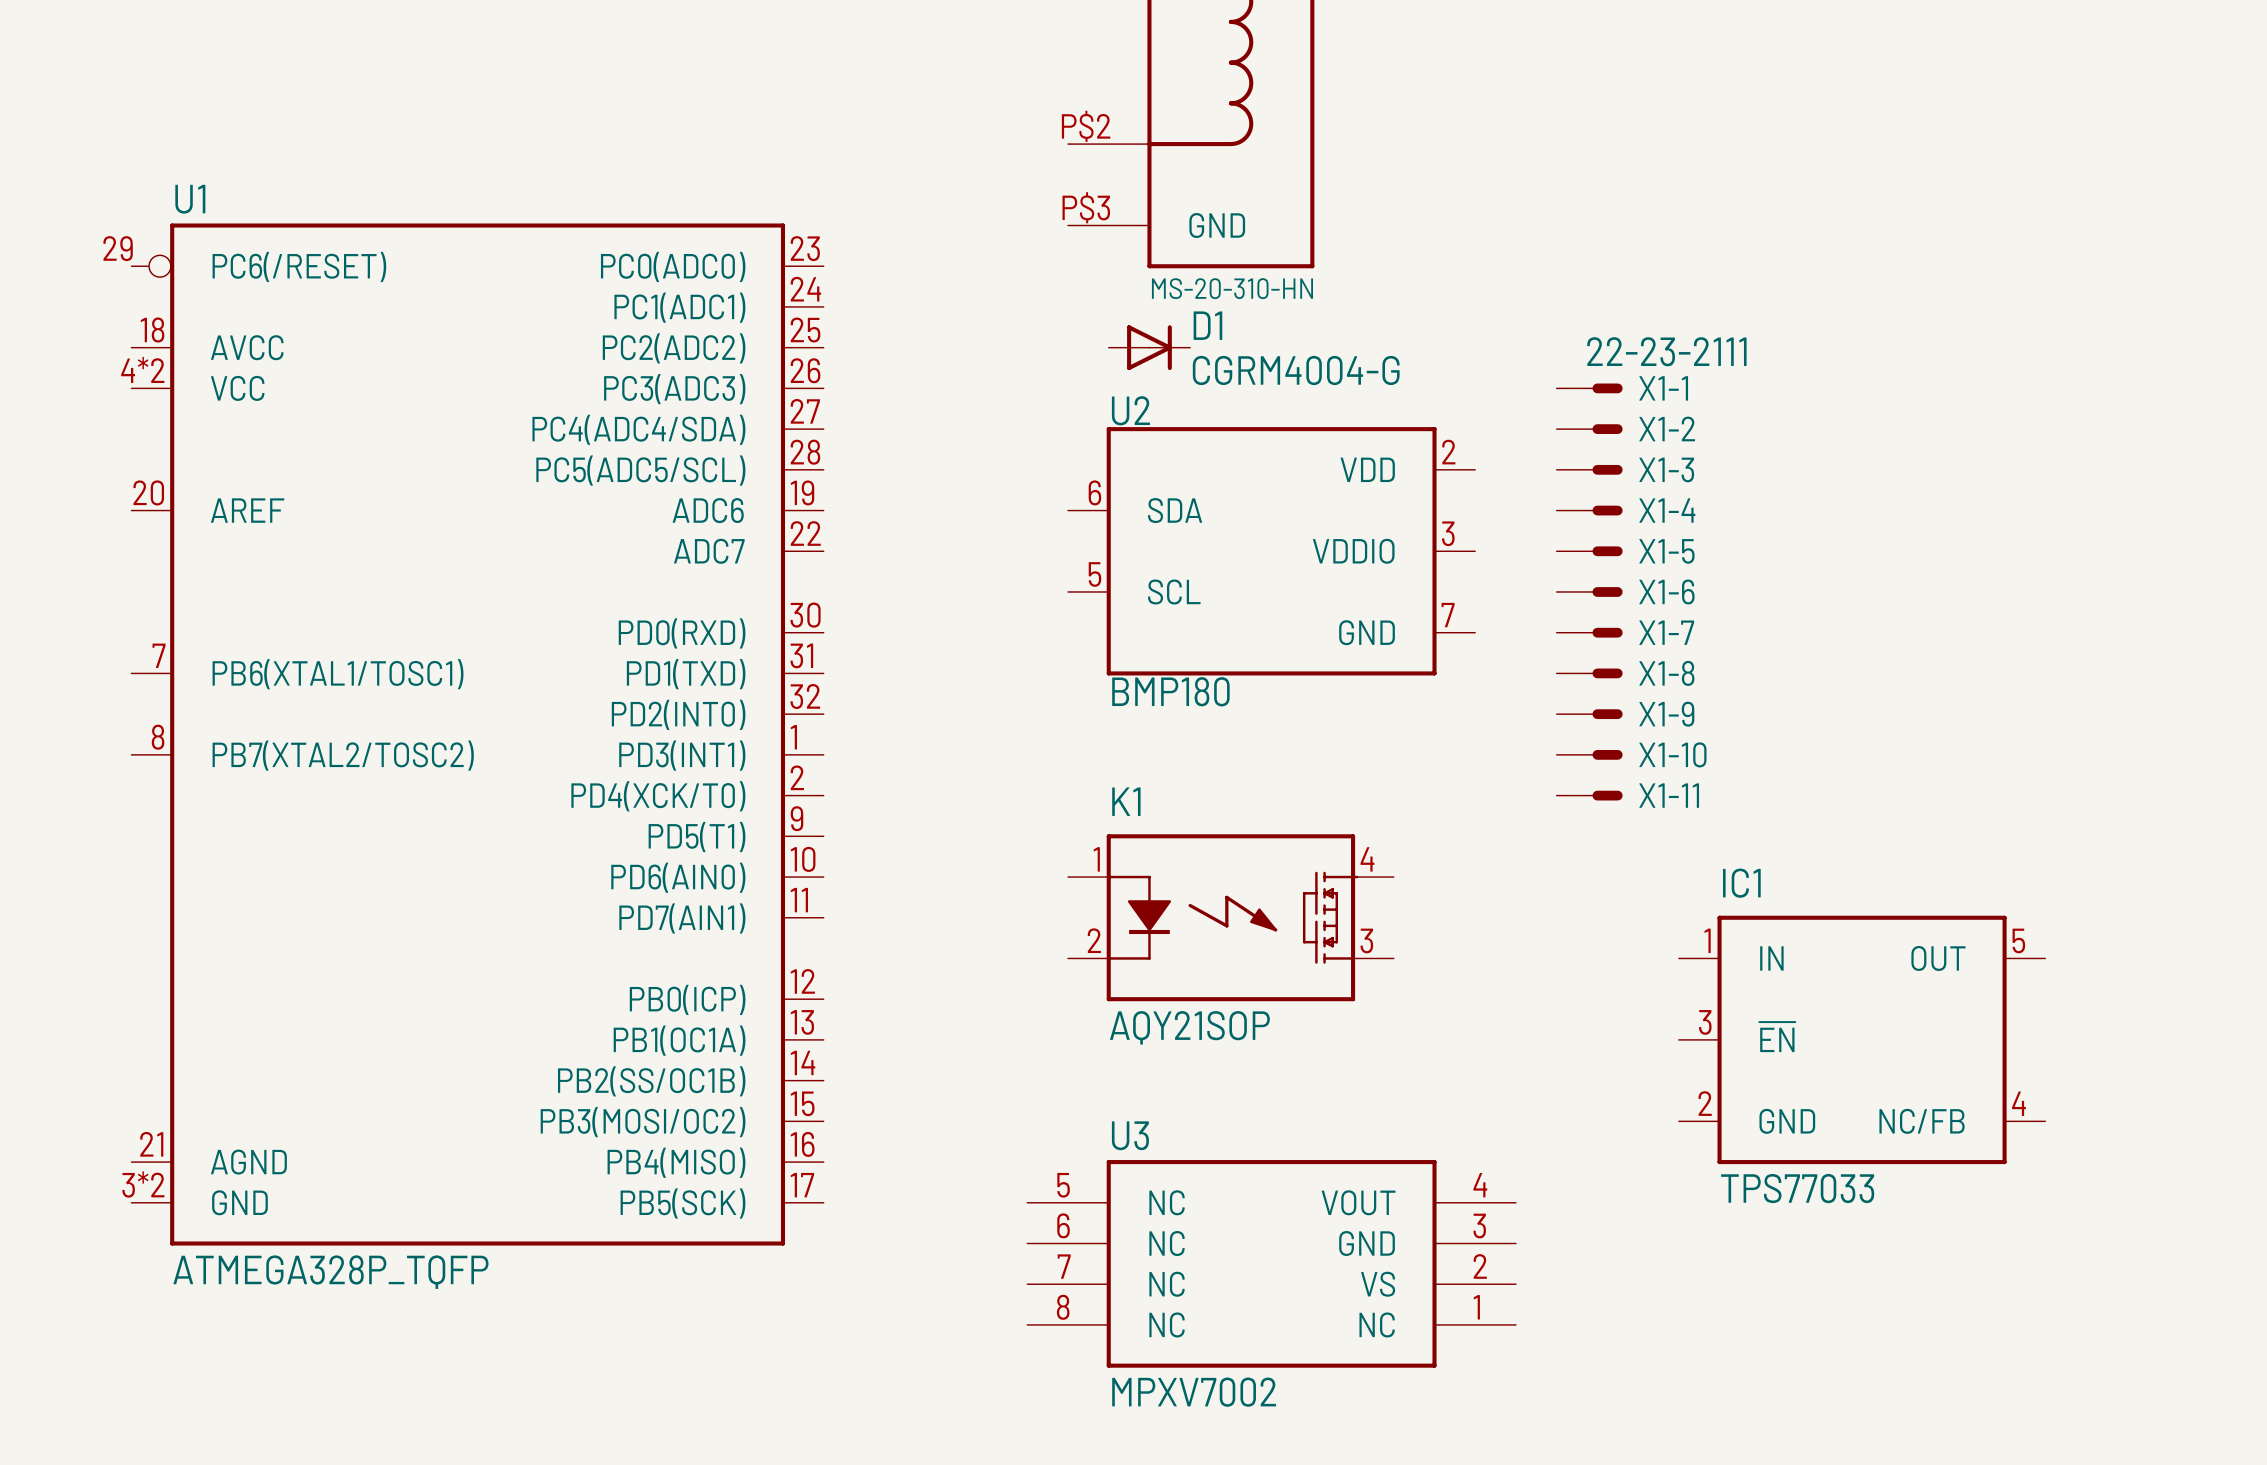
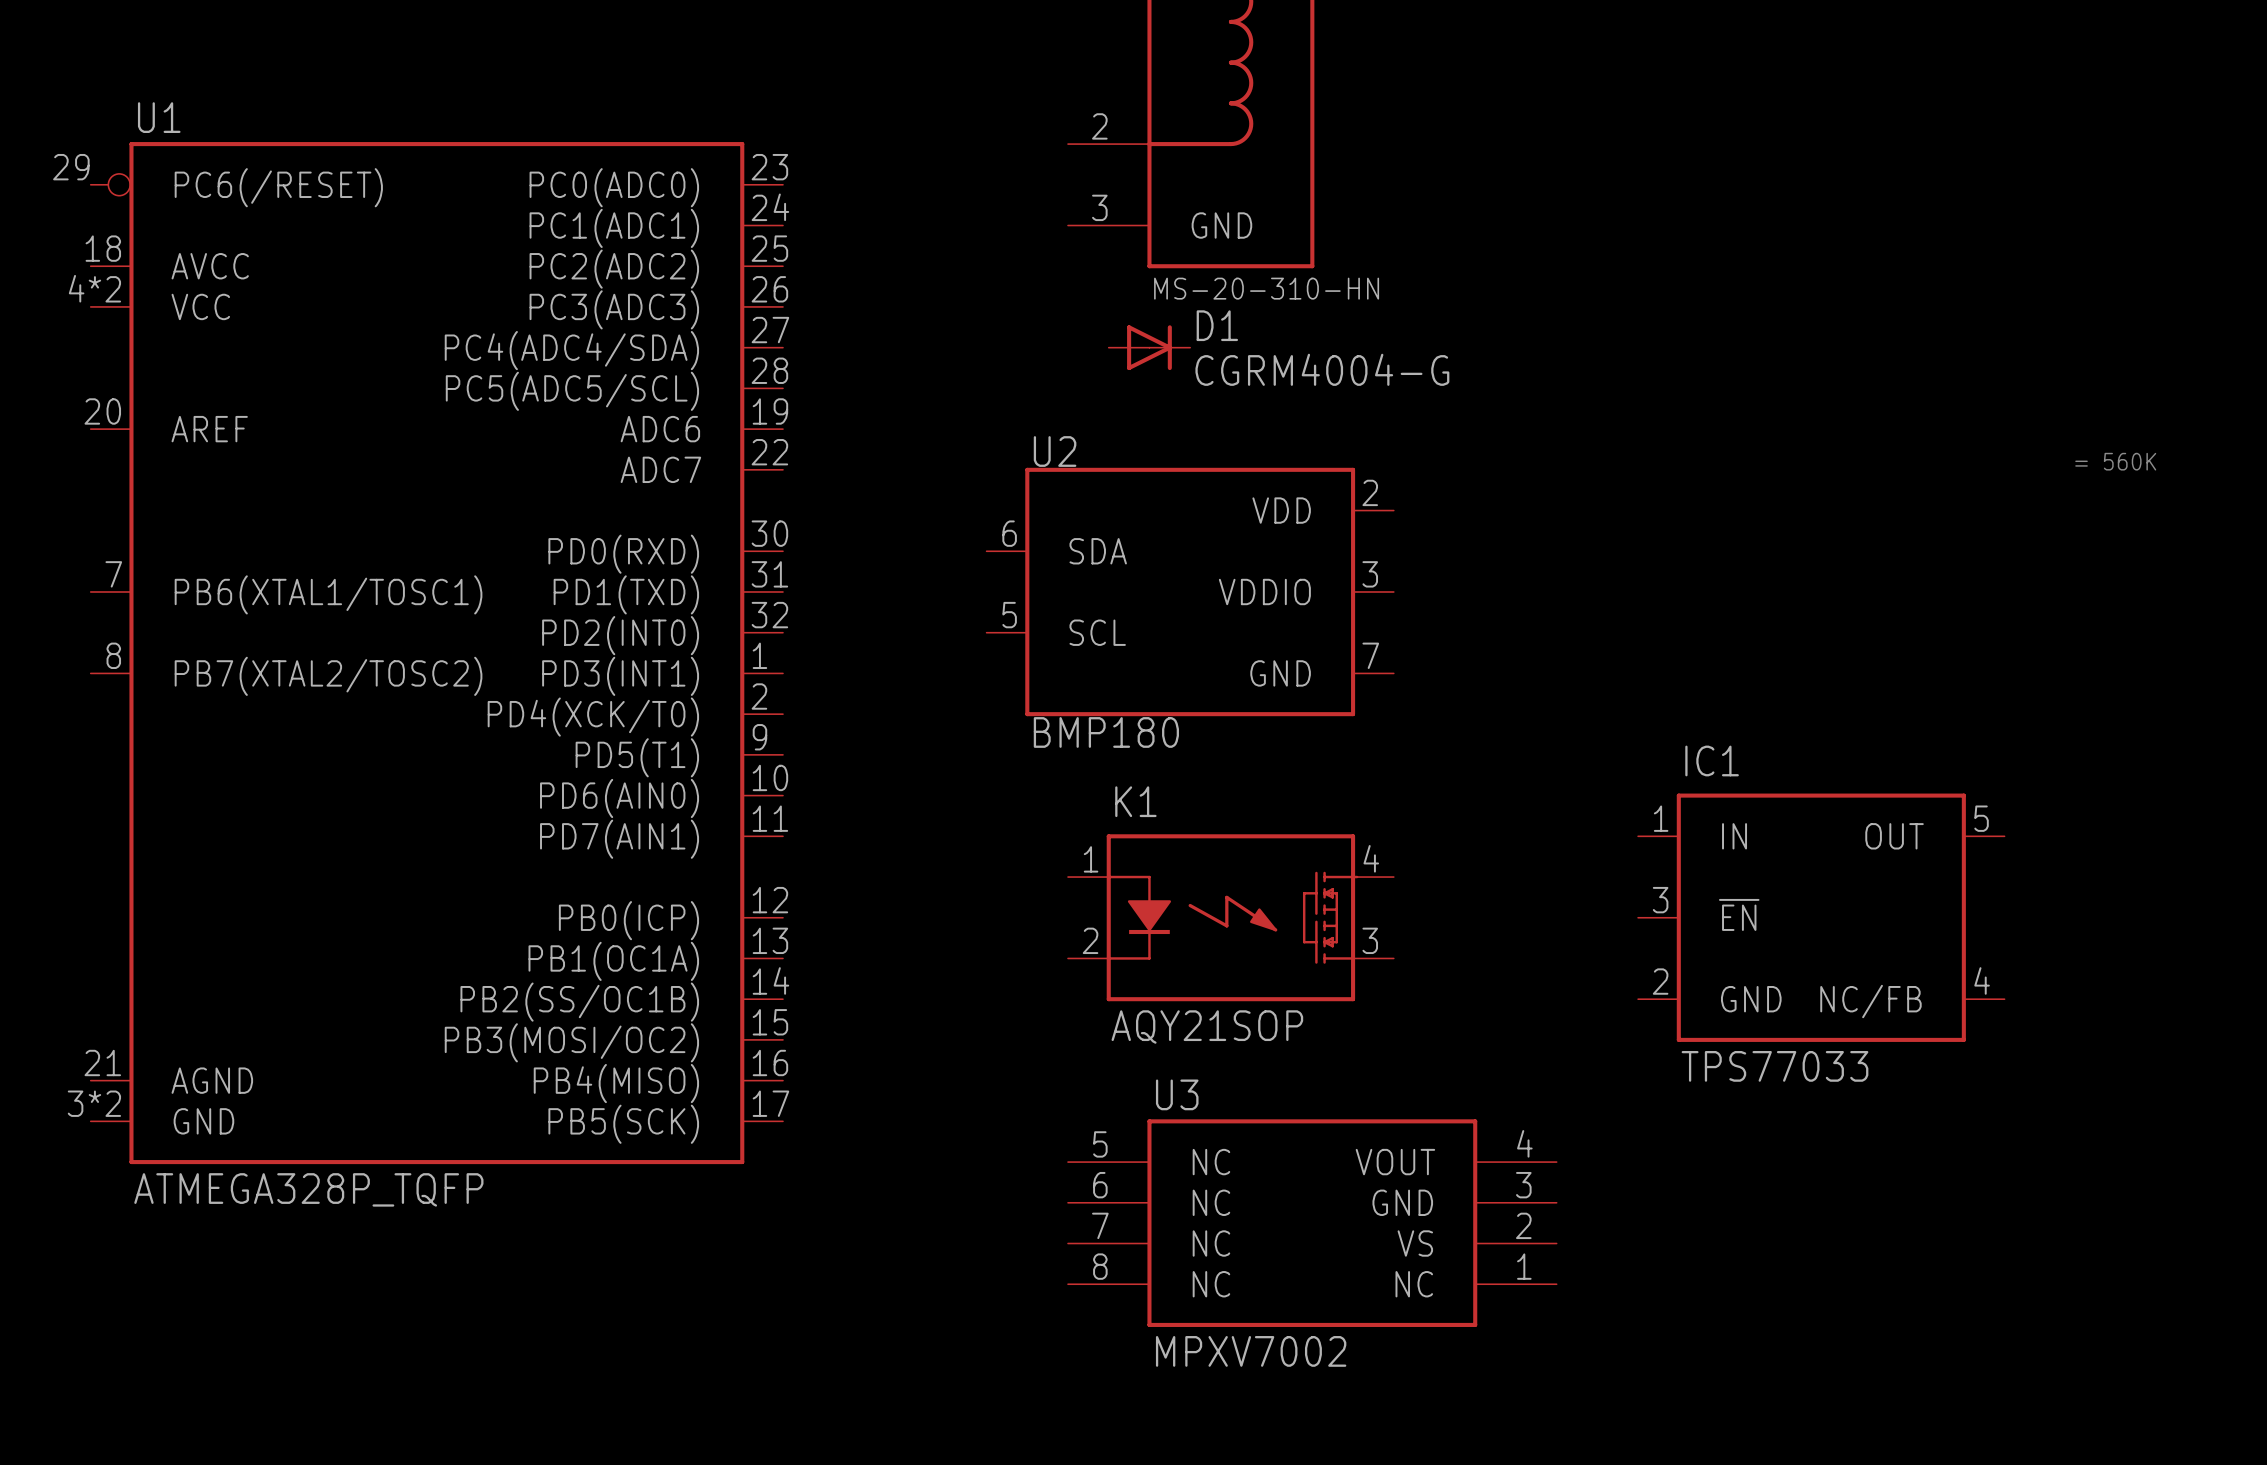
part pin number: P$2 (1086, 126) -> 2 (1099, 126)
part pin number: P$3 (1086, 207) -> 3 (1099, 207)
X1-1: 22-23-2111 (1589, 388) -> none
X1-2: (1589, 429) -> none
text: none -> = 560K (2115, 461)
X1-3: (1589, 469) -> none
X1-4: (1589, 510) -> none
U2 position: (1271, 551) -> (1190, 591)
X1-5: (1589, 551) -> none
X1-6: (1589, 591) -> none
X1-7: (1589, 632) -> none
X1-8: (1589, 673) -> none
X1-9: (1589, 714) -> none
U1 position: (477, 734) -> (436, 653)
X1-10: (1589, 754) -> none
X1-11: (1589, 795) -> none
IC1 position: (1862, 1039) -> (1821, 917)
U3 position: (1271, 1263) -> (1312, 1223)

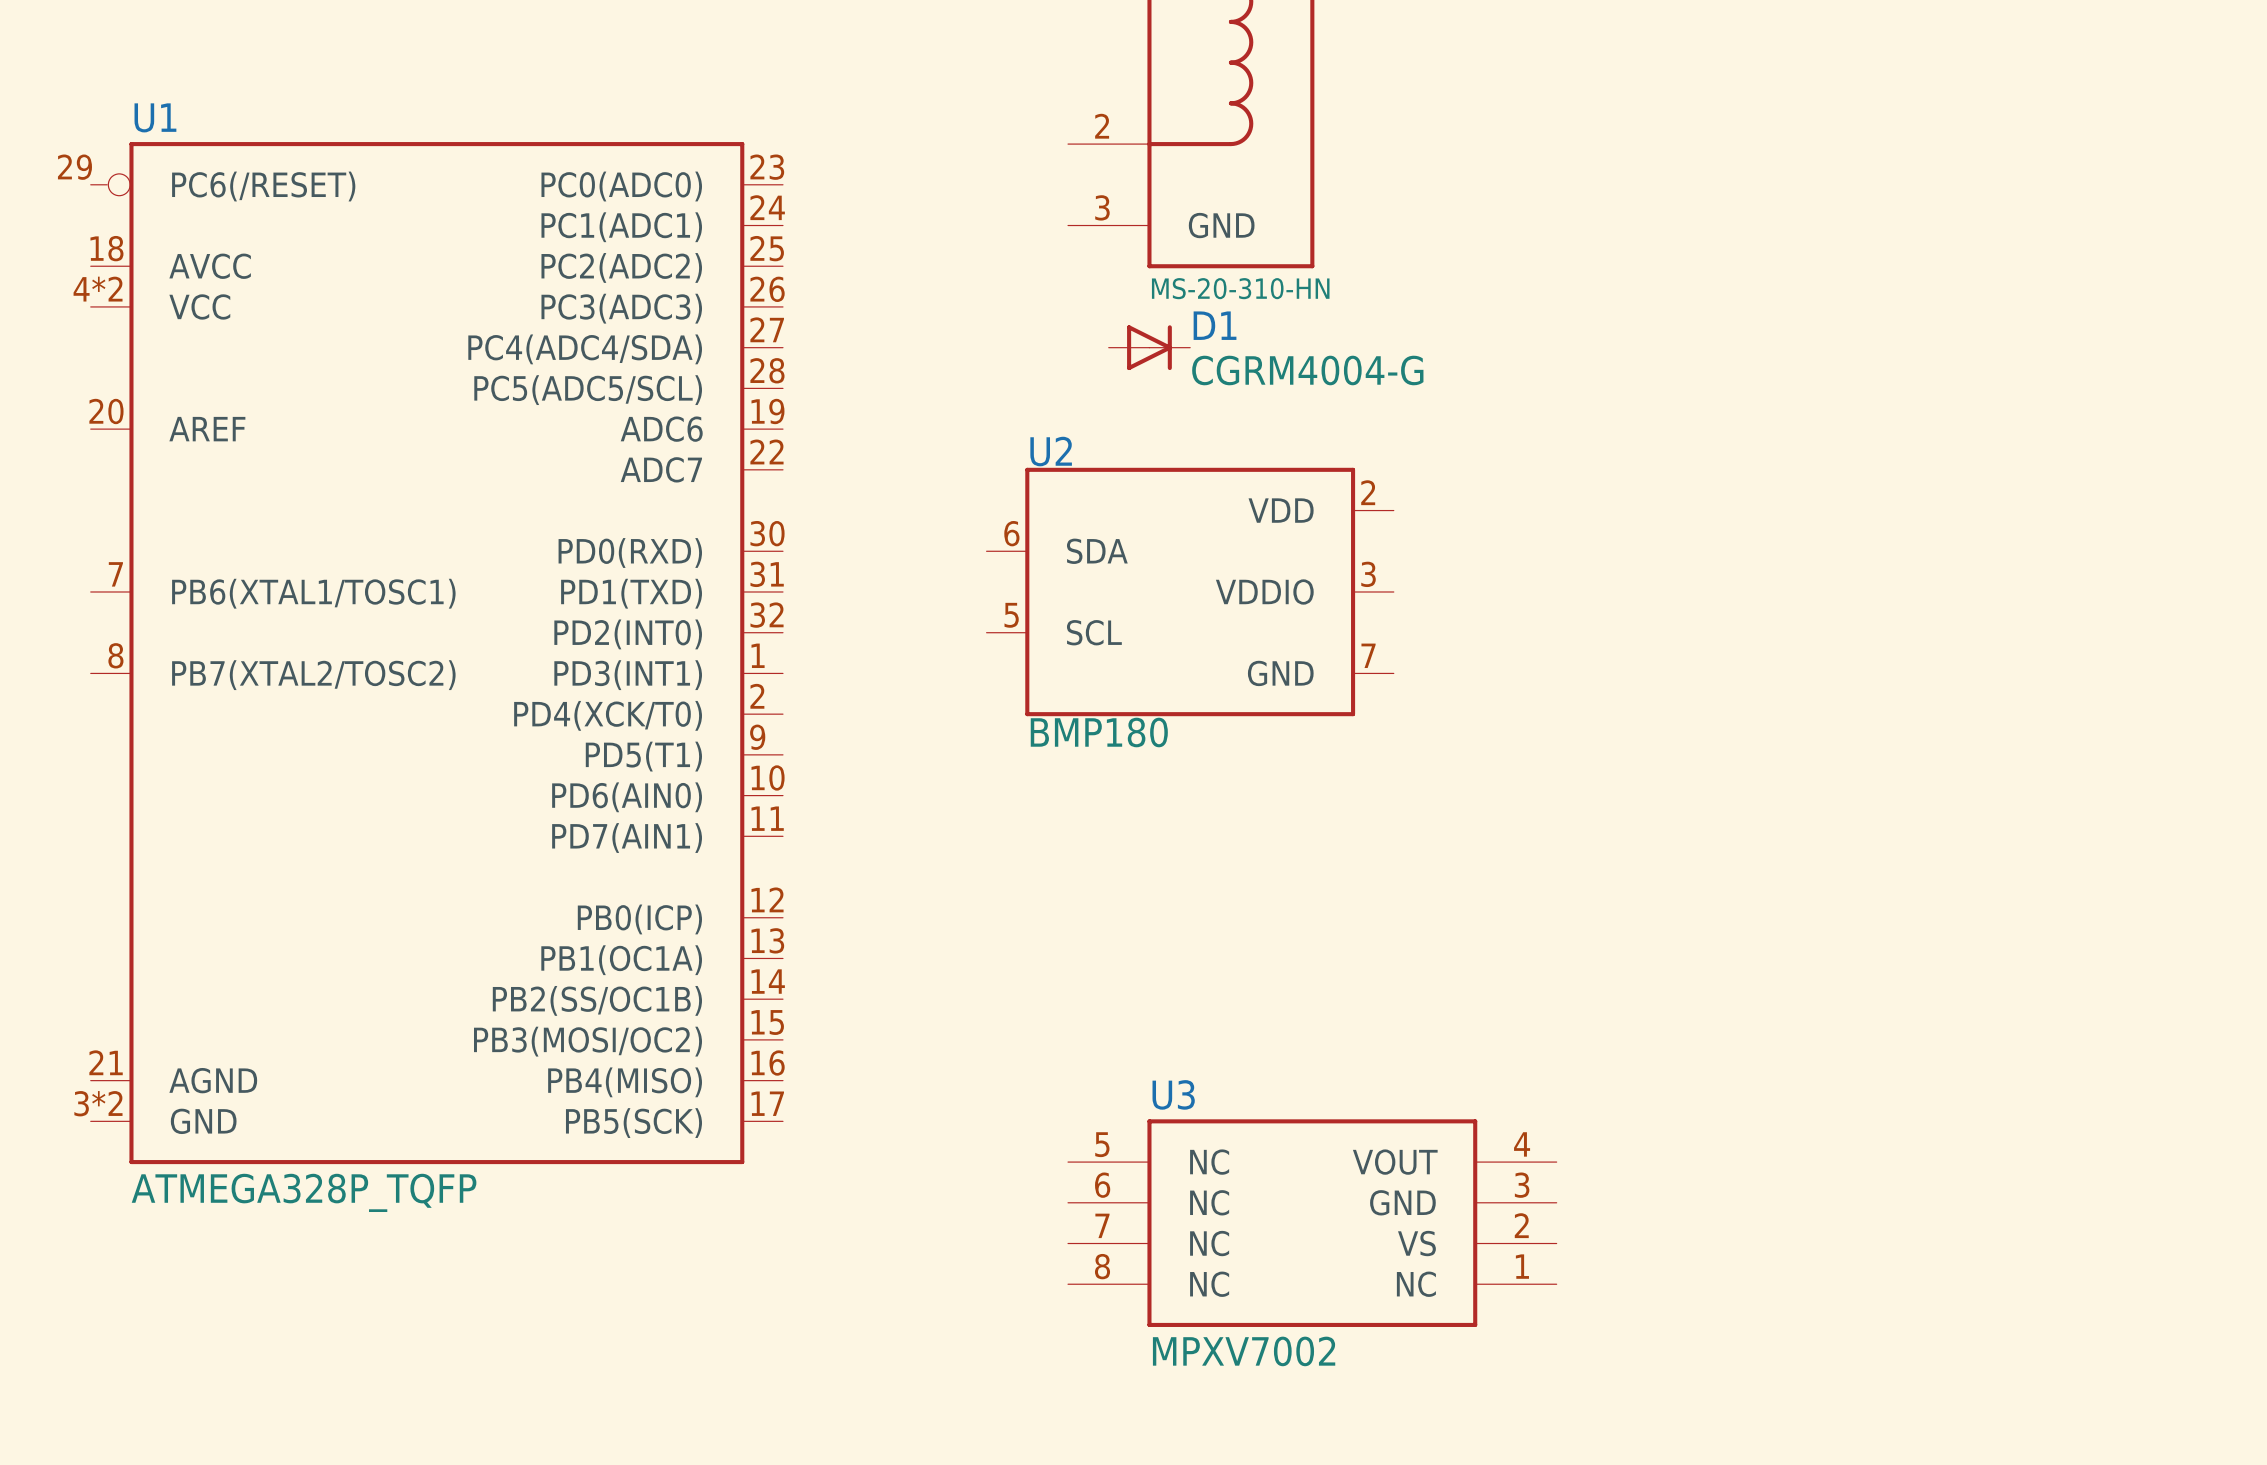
text: = 560K (2115, 461) -> none
K1: AQY21SOP (1230, 917) -> none
IC1: TPS77033 (1821, 917) -> none

